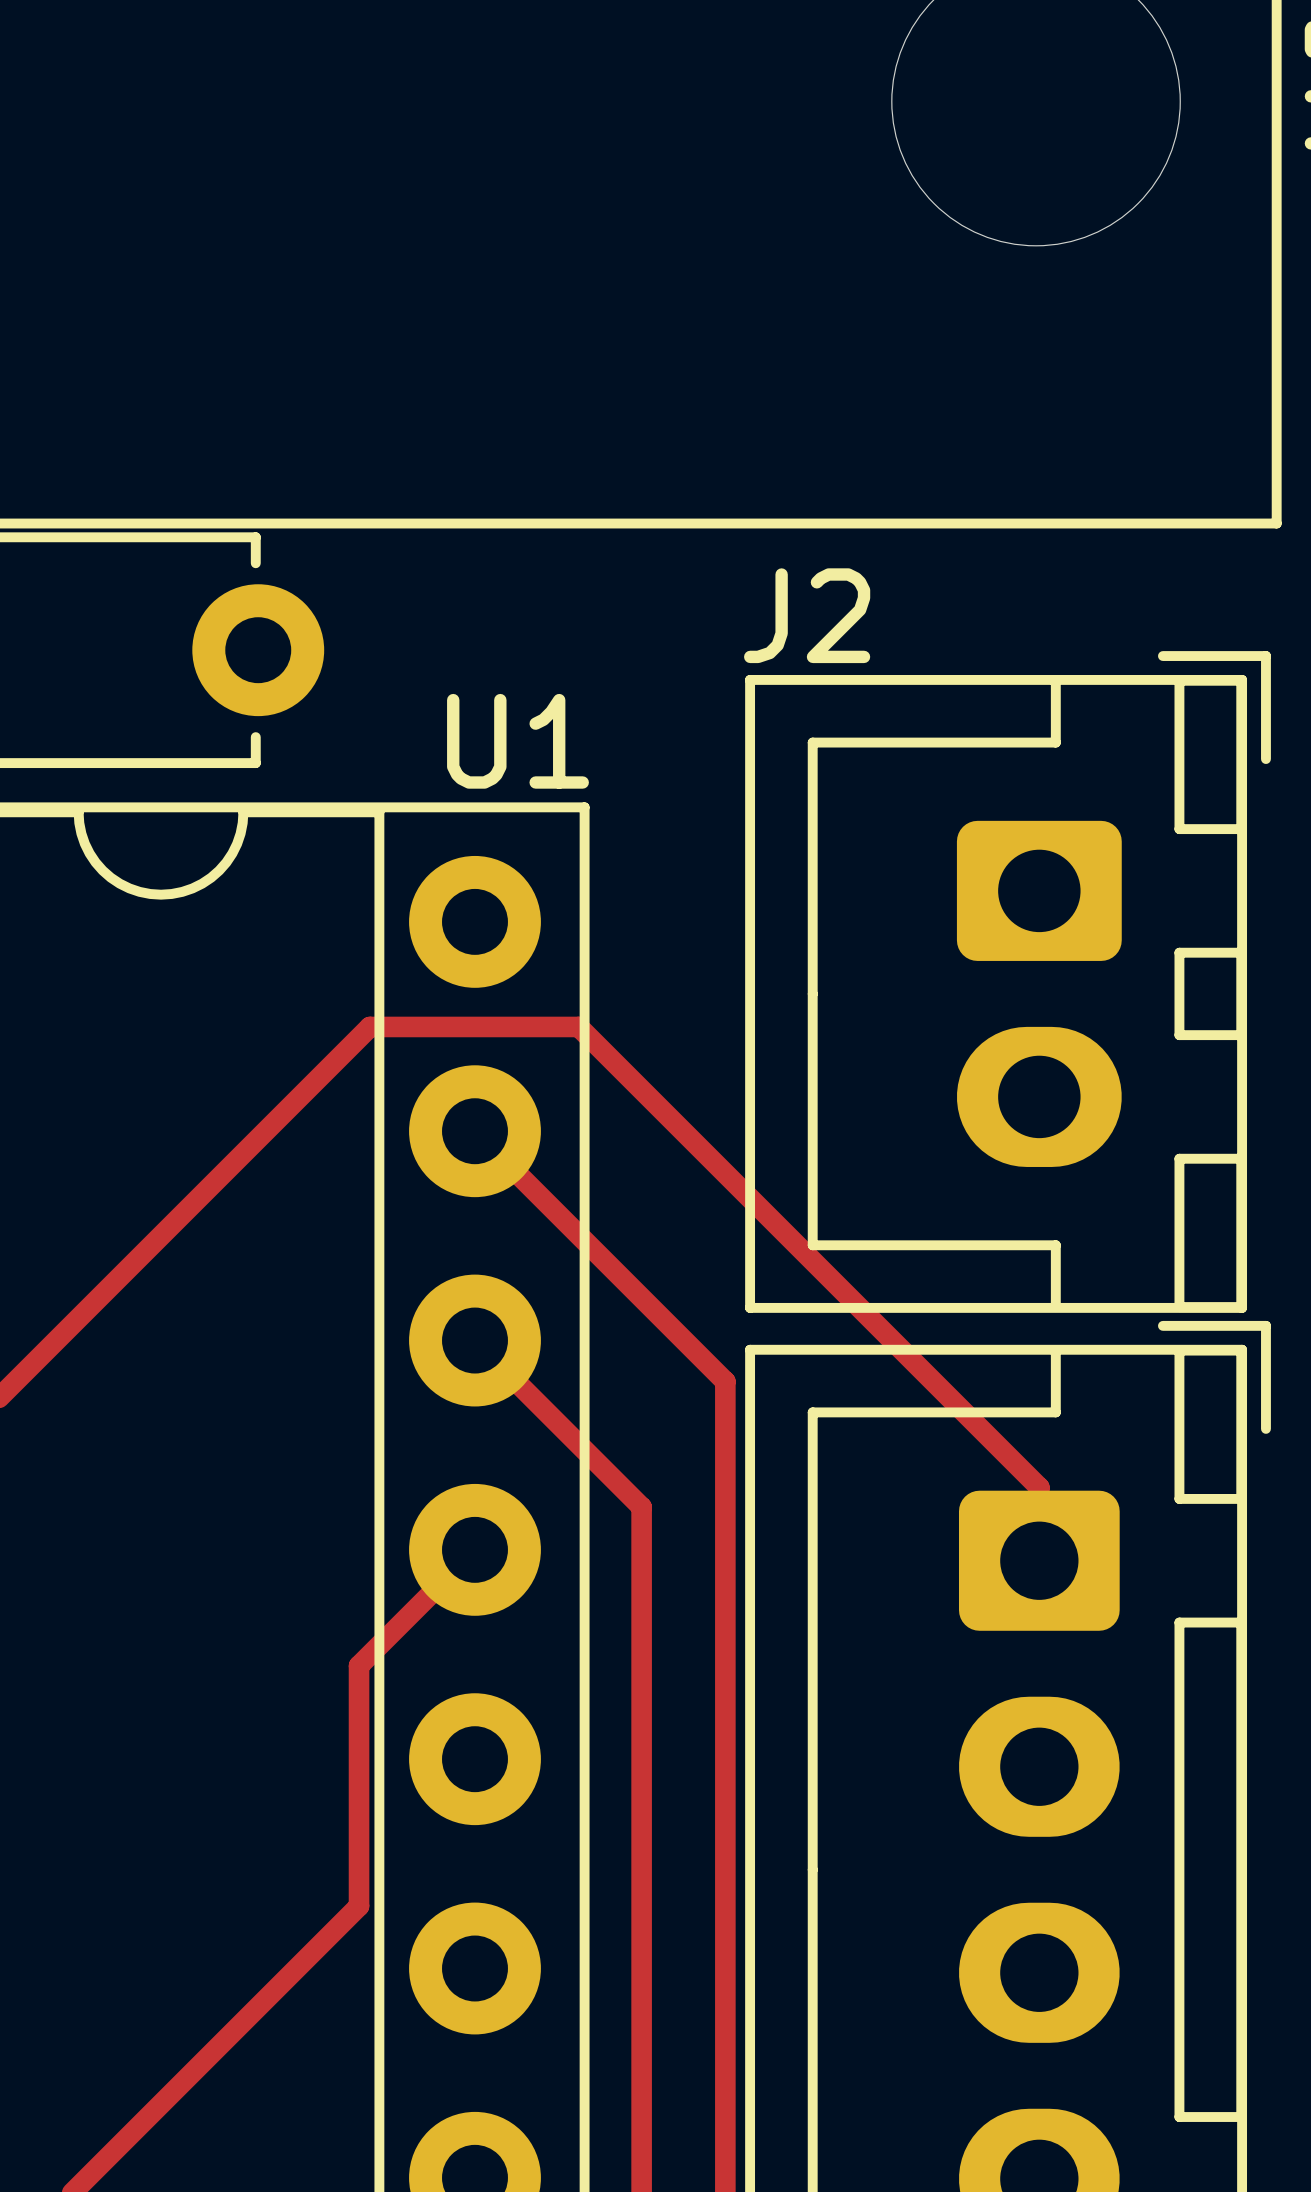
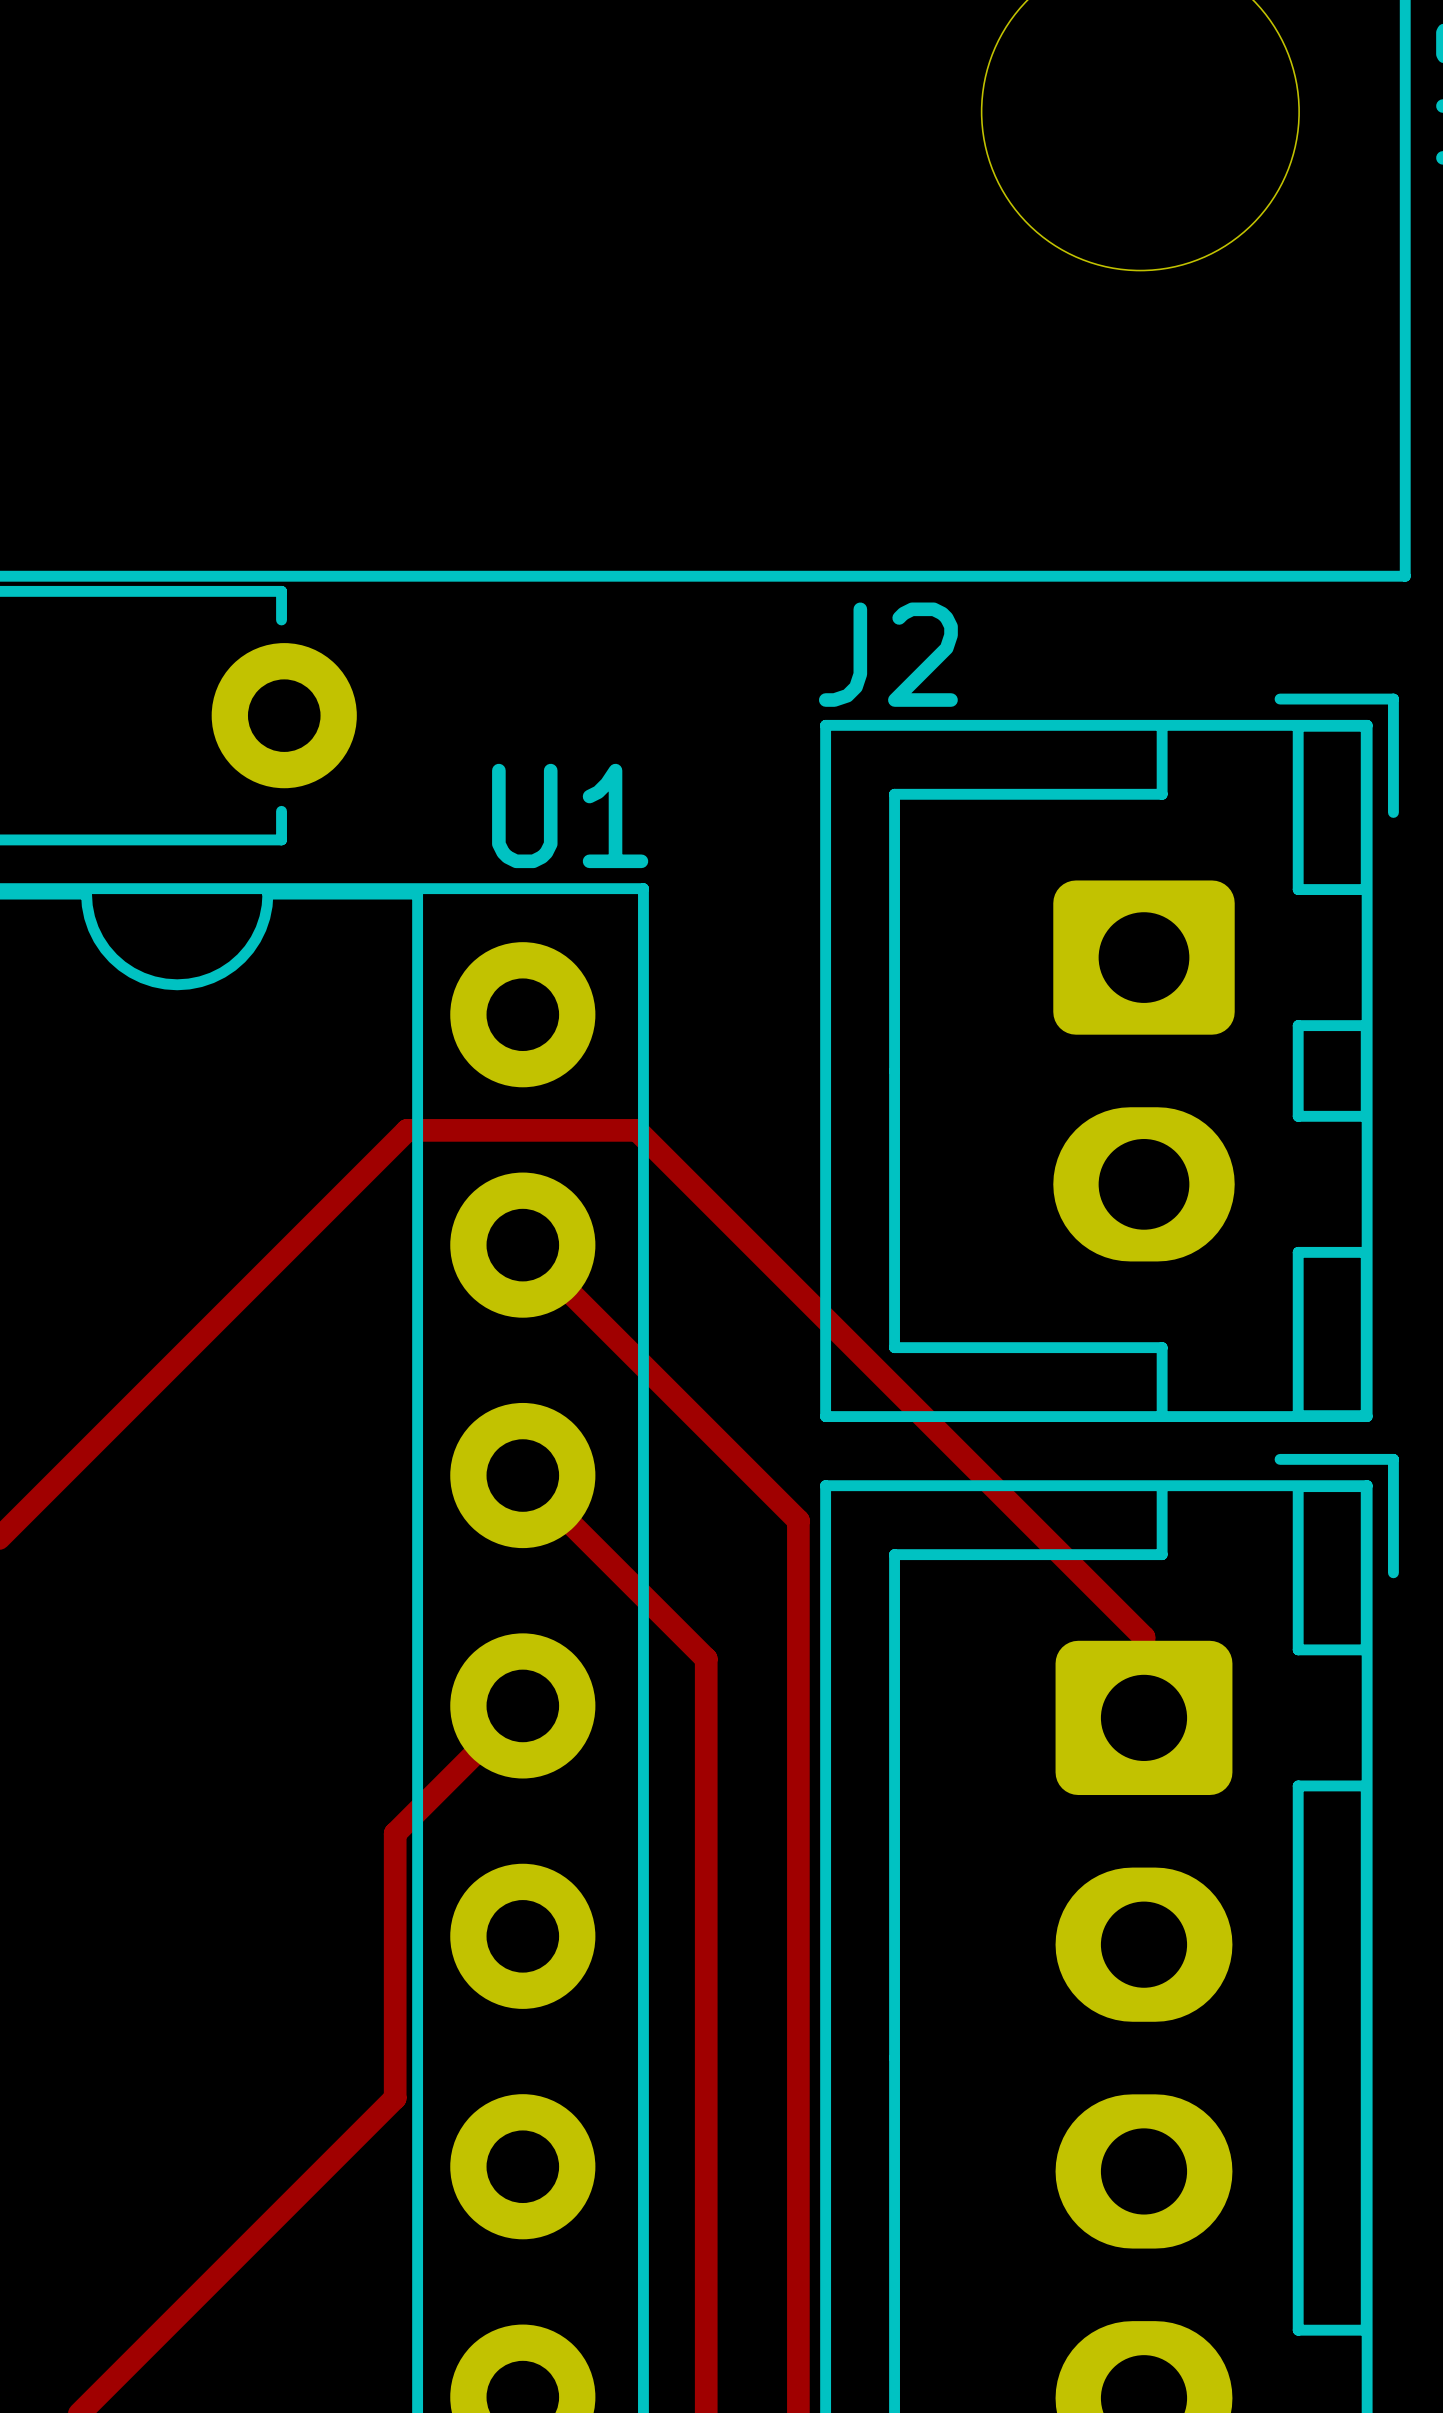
J2 position: (1008, 981) -> (1109, 1057)

